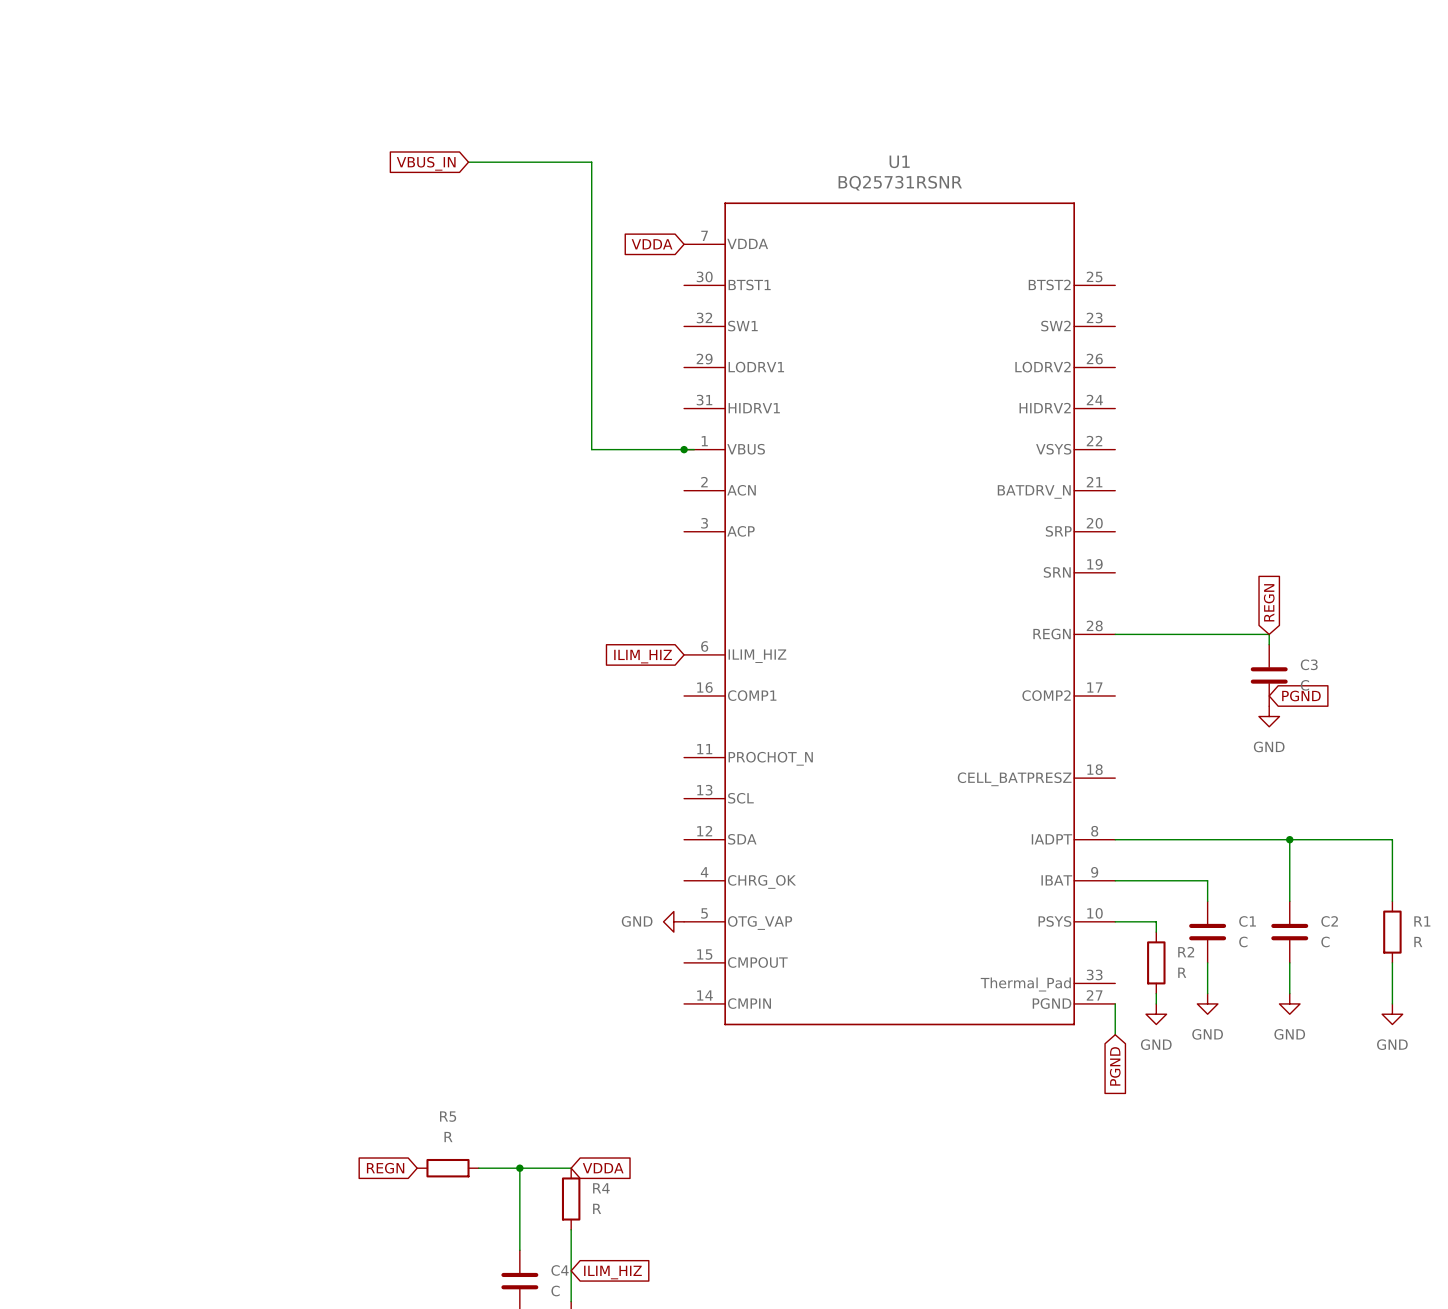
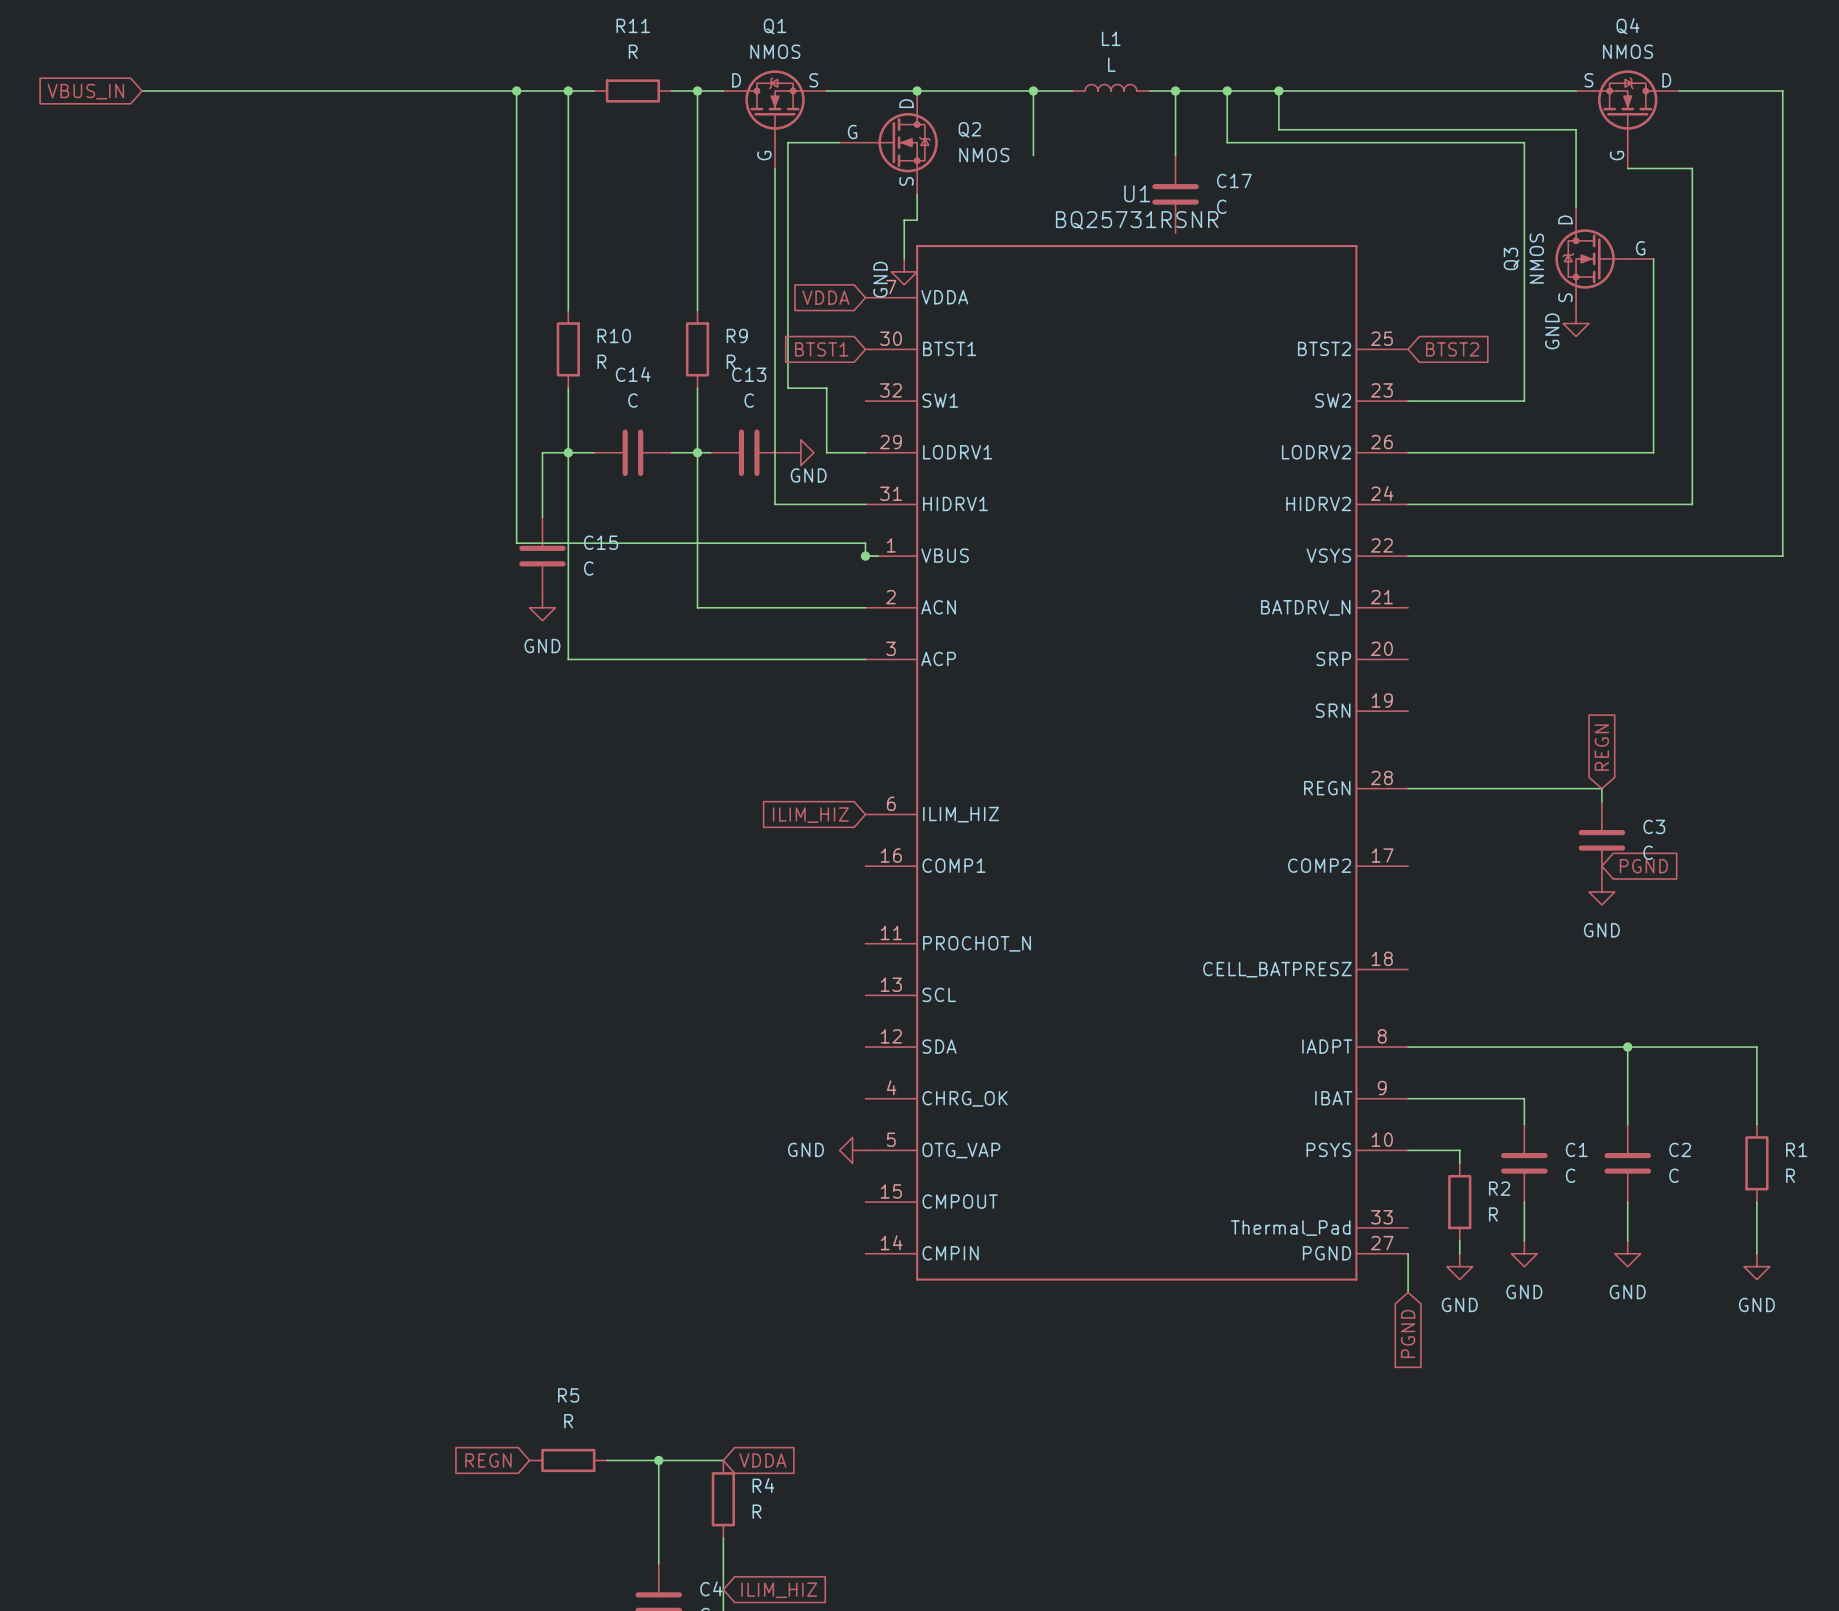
L1: none -> L (1110, 87)
wire: none -> (141, 91) (594, 91)
junction: none -> (516, 91)
wire: none -> (568, 91) (568, 310)
junction: none -> (568, 91)
R11: none -> R (632, 91)
wire: none -> (671, 91) (723, 91)
wire: none -> (697, 91) (697, 310)
junction: none -> (697, 91)
wire: none -> (826, 91) (1072, 91)
junction: none -> (917, 91)
wire: none -> (1033, 91) (1033, 155)
junction: none -> (1033, 91)
wire: none -> (1149, 91) (1576, 91)
wire: none -> (1175, 91) (1175, 155)
junction: none -> (1175, 91)
wire: none -> (1227, 91) (1227, 142) (1524, 142) (1524, 401) (1408, 401)
junction: none -> (1227, 91)
wire: none -> (1278, 91) (1278, 129) (1576, 129) (1576, 207)
junction: none -> (1278, 91)
wire: none -> (1679, 91) (1782, 91) (1782, 556) (1408, 556)
global label: none -> VBUS_IN (85, 91)
Q1: none -> NMOS (775, 119)
Q4: none -> NMOS (1627, 119)
wire: none -> (839, 142) (787, 142) (787, 388) (826, 388) (826, 452) (865, 452)
Q2: none -> NMOS (888, 142)
wire: none -> (775, 168) (775, 504) (865, 504)
wire: none -> (1627, 168) (1692, 168) (1692, 504) (1408, 504)
wire: (468, 162) (591, 162) (591, 449) (684, 449) -> (516, 91) (516, 543) (865, 543) (865, 556)
wire: none -> (917, 194) (917, 220) (904, 220) (904, 258)
C17: none -> C (1175, 194)
global label: VBUS_IN (426, 163) -> none
Q3: none -> NMOS (1604, 258)
wire: none -> (1653, 258) (1653, 452) (1408, 452)
power symbol: none -> GND (904, 271)
power symbol: none -> GND (1576, 323)
R10: none -> R (568, 349)
R9: none -> R (697, 349)
global label: none -> BTST1 (821, 349)
global label: none -> BTST2 (1452, 349)
wire: none -> (568, 388) (568, 659) (865, 659)
wire: none -> (697, 388) (697, 607) (865, 607)
junction: none -> (568, 452)
wire: none -> (594, 452) (542, 452) (542, 517)
C14: none -> C (632, 452)
wire: none -> (671, 452) (710, 452)
junction: none -> (697, 452)
C13: none -> C (749, 452)
power symbol: none -> GND (800, 452)
C15: none -> C (542, 556)
power symbol: none -> GND (542, 607)

